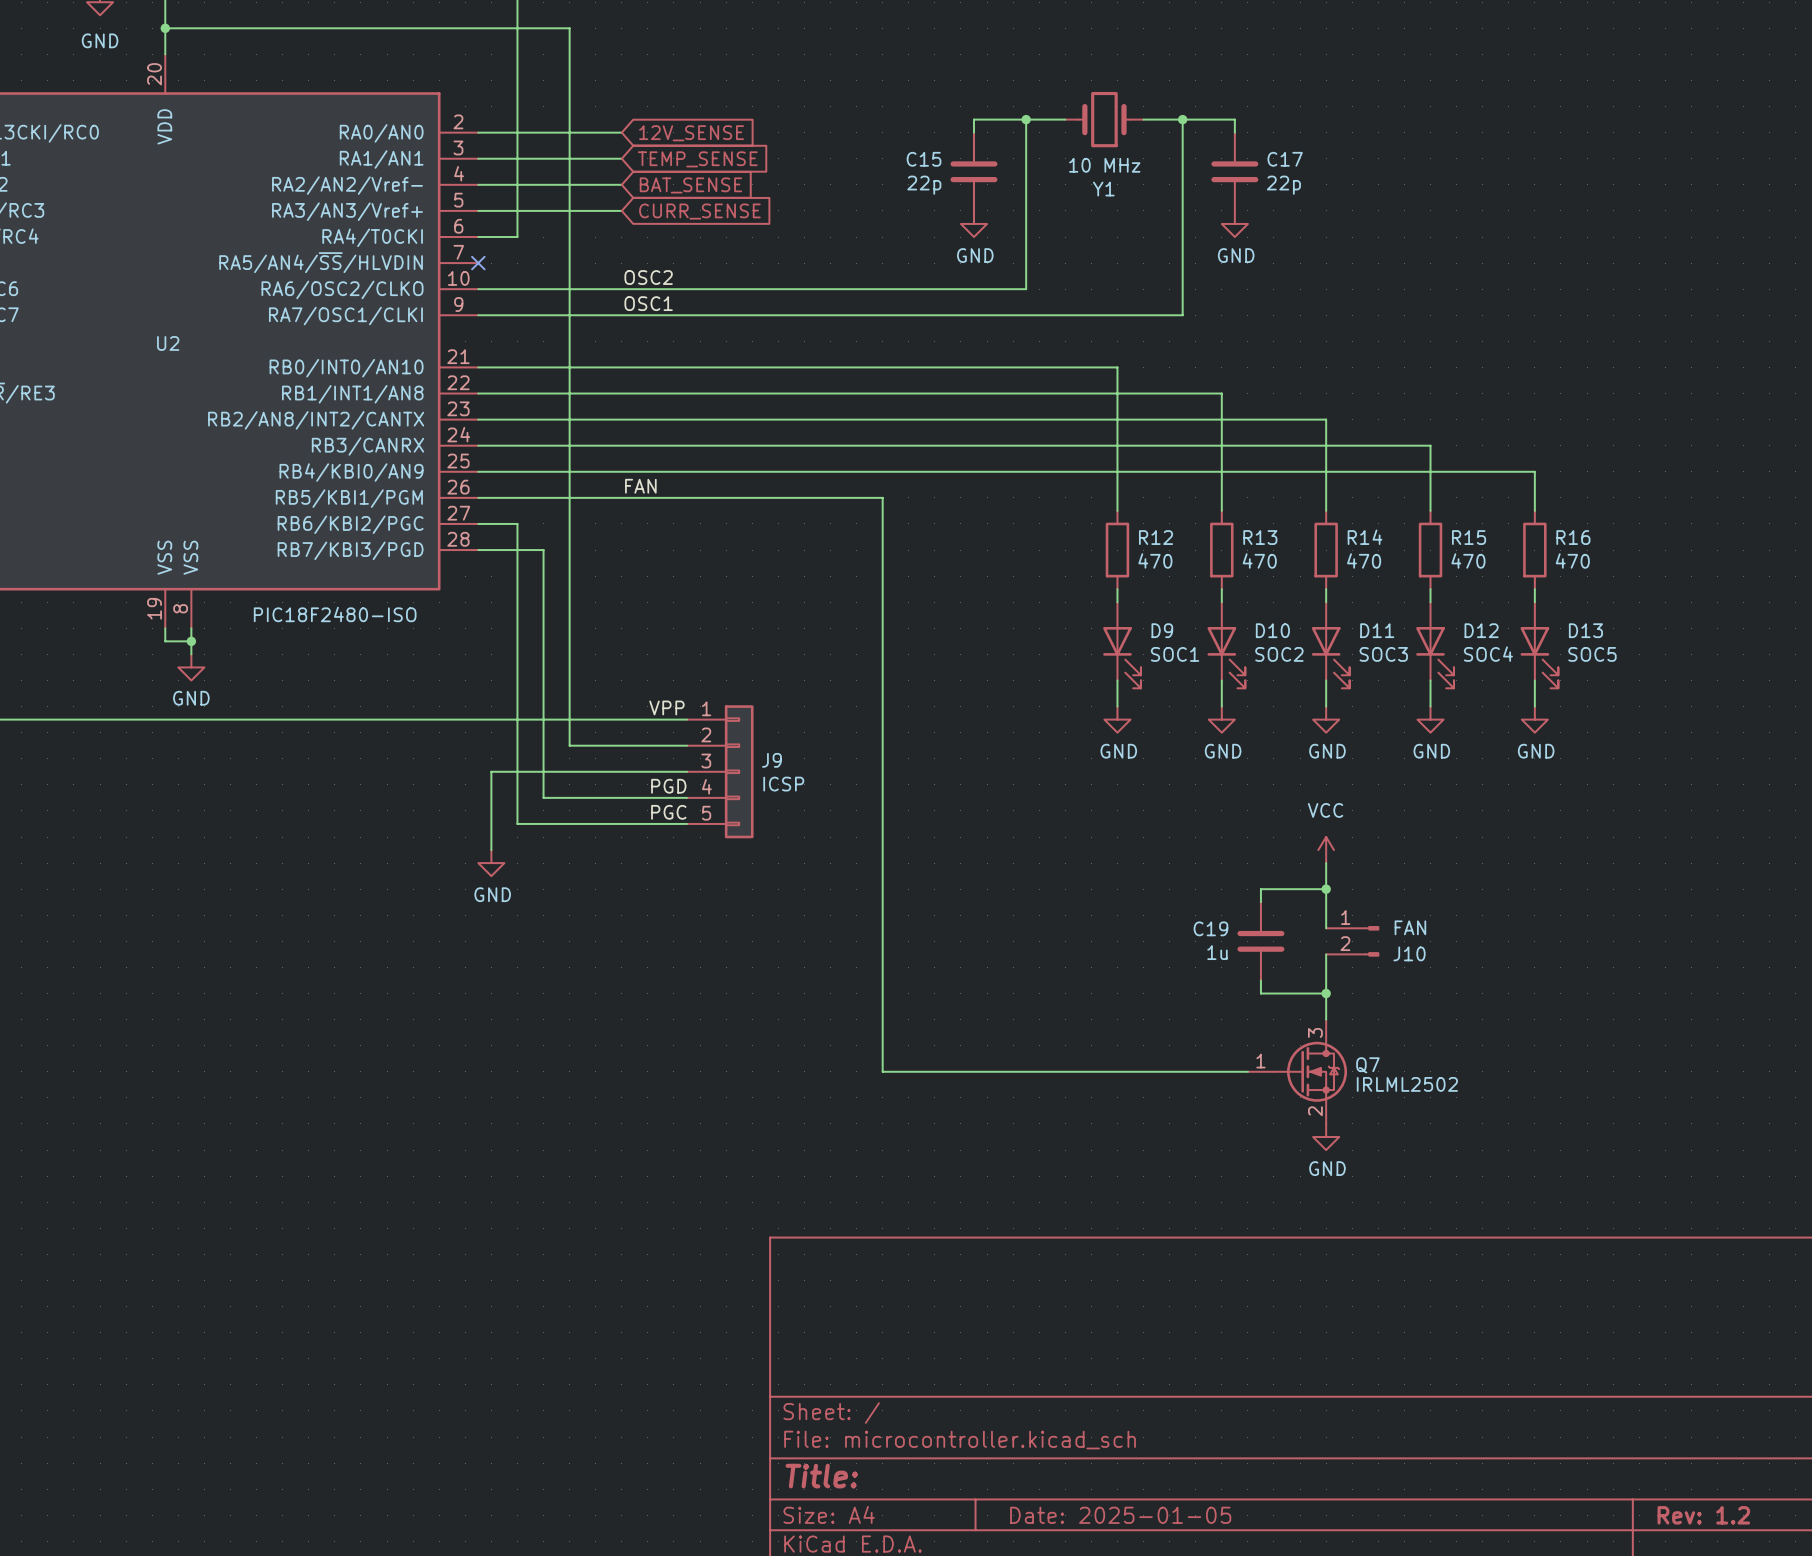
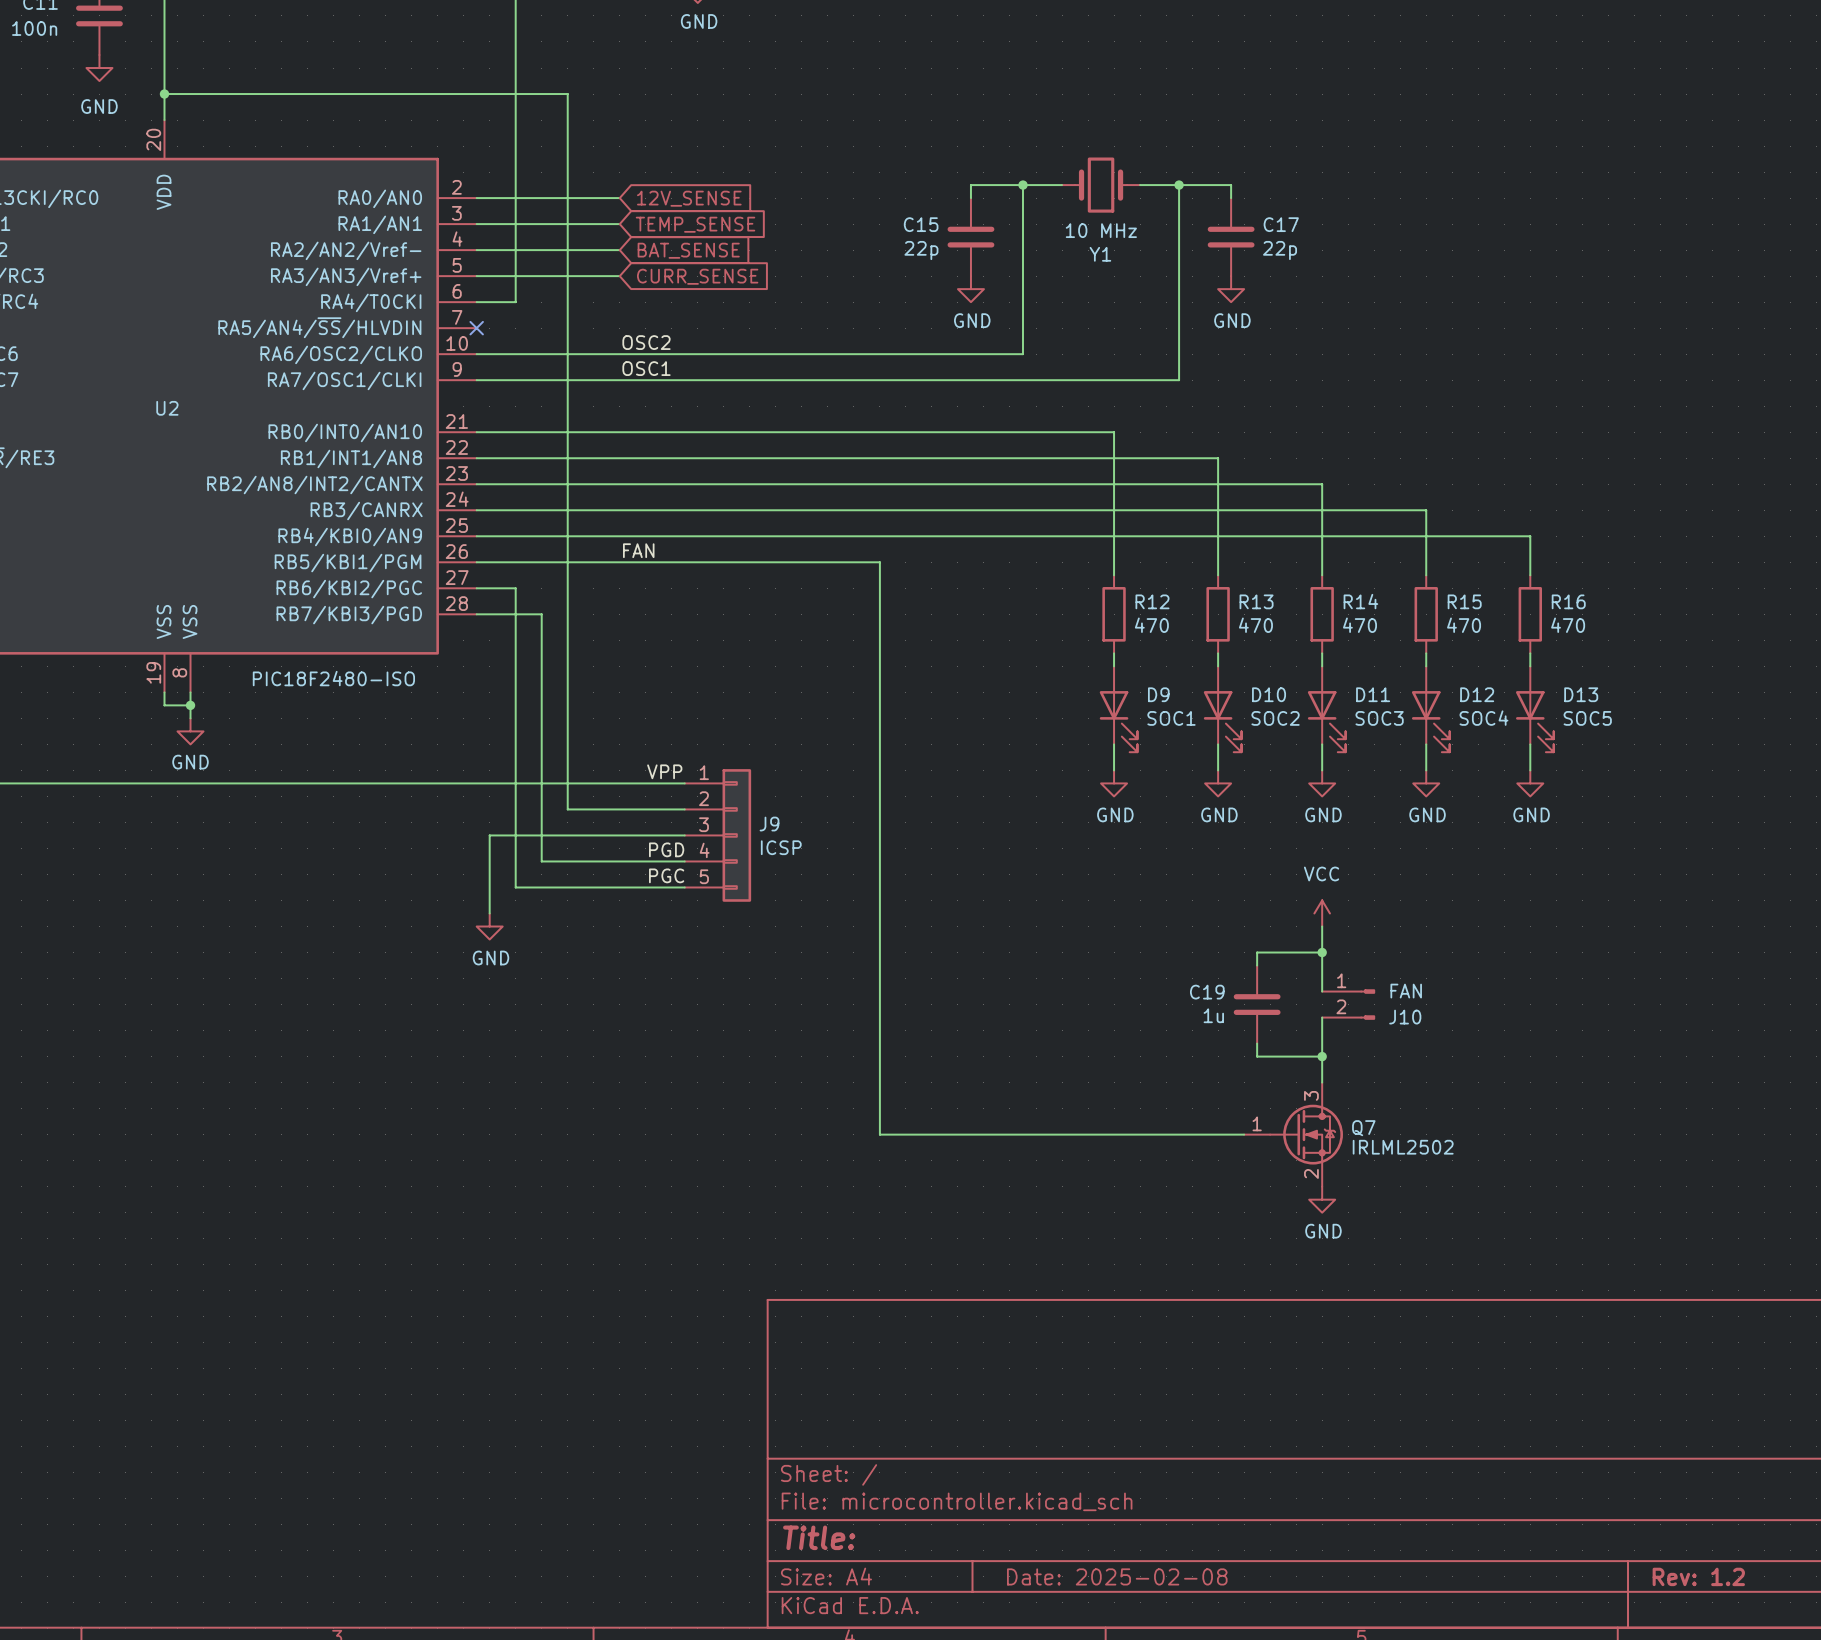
title block: Date: 2025-01-05 (1120, 1515) -> Date: 2025-02-08 (1117, 1576)

